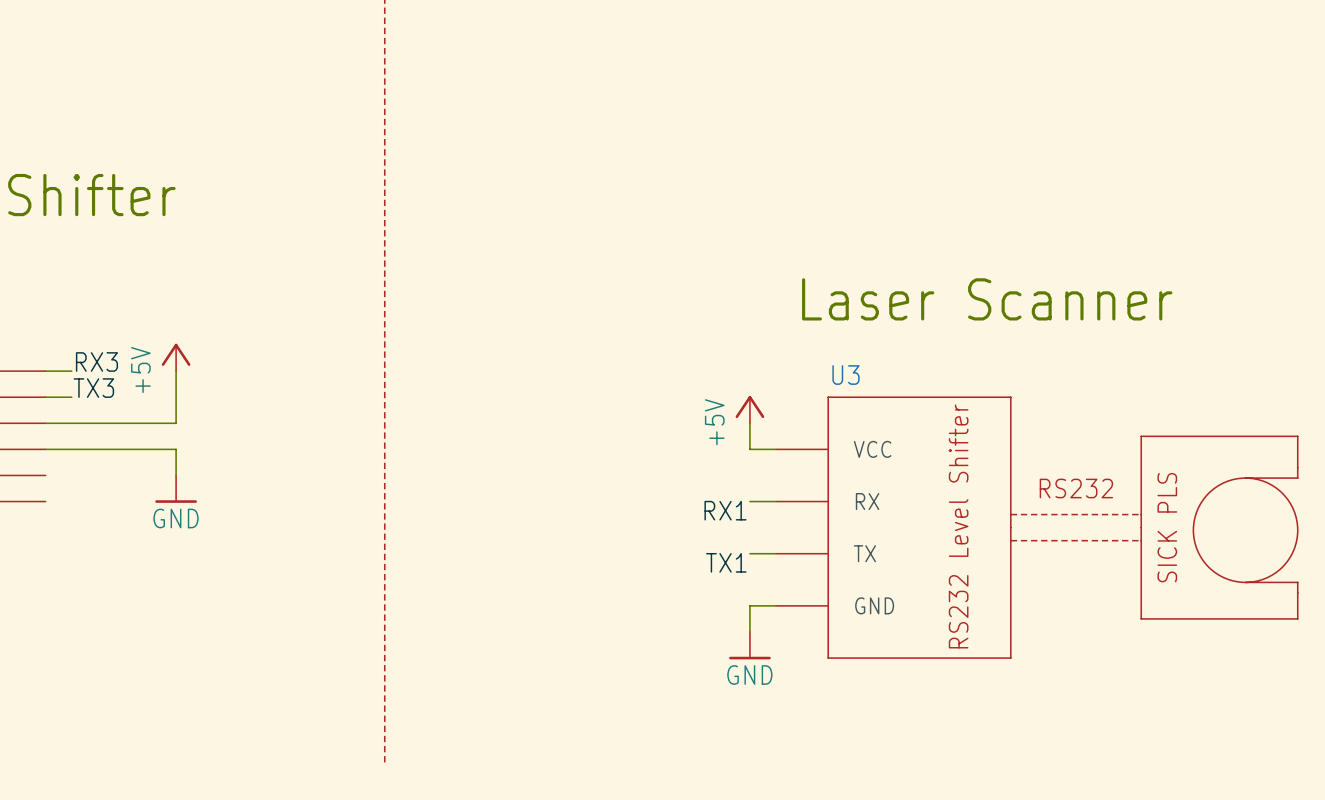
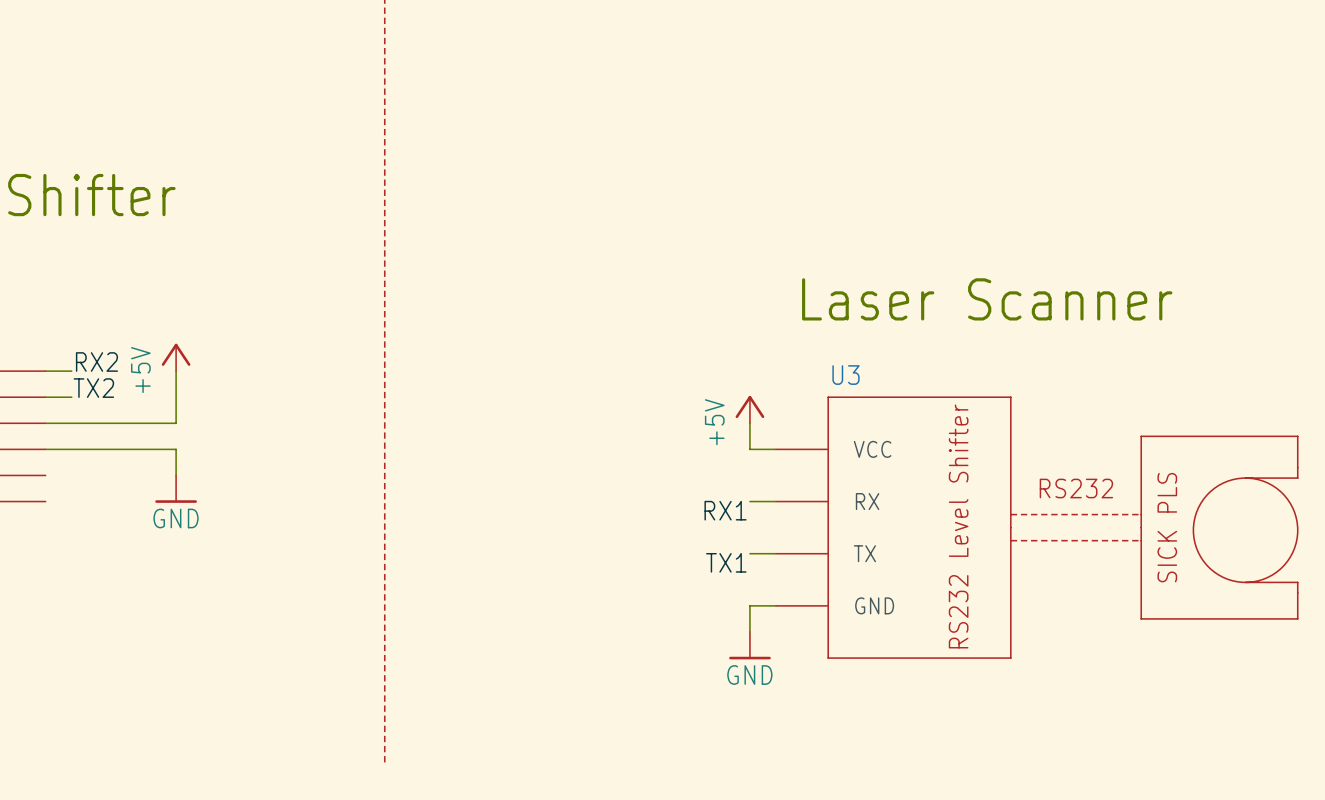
label: RX3 (96, 361) -> RX2 (96, 361)
label: TX3 (93, 388) -> TX2 (93, 388)

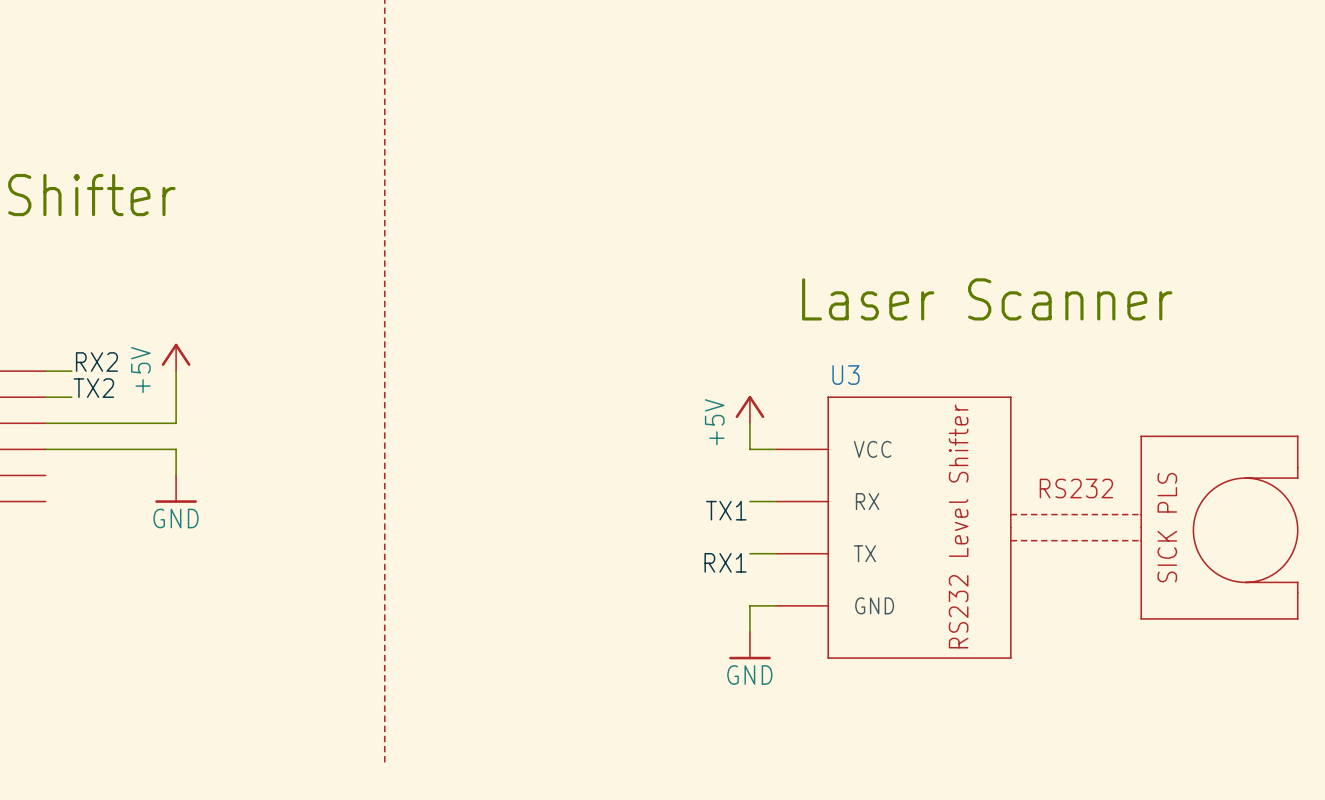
label: RX1 (725, 510) -> TX1 (726, 510)
label: TX1 (726, 562) -> RX1 (725, 562)

